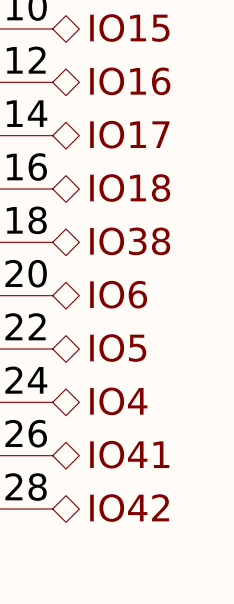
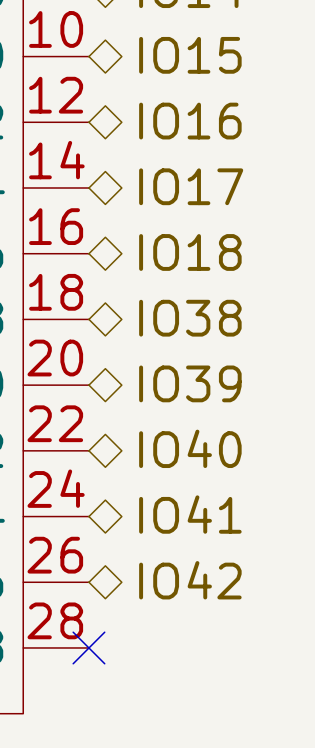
hierarchical label: IO6 (118, 294) -> IO39 (190, 383)
hierarchical label: IO5 (118, 348) -> IO40 (190, 448)
hierarchical label: IO4 (118, 401) -> IO41 (190, 514)
hierarchical label: IO41 (129, 454) -> IO42 (190, 580)
hierarchical label: IO42 (129, 508) -> none
no-connect mark: none -> (88, 647)

